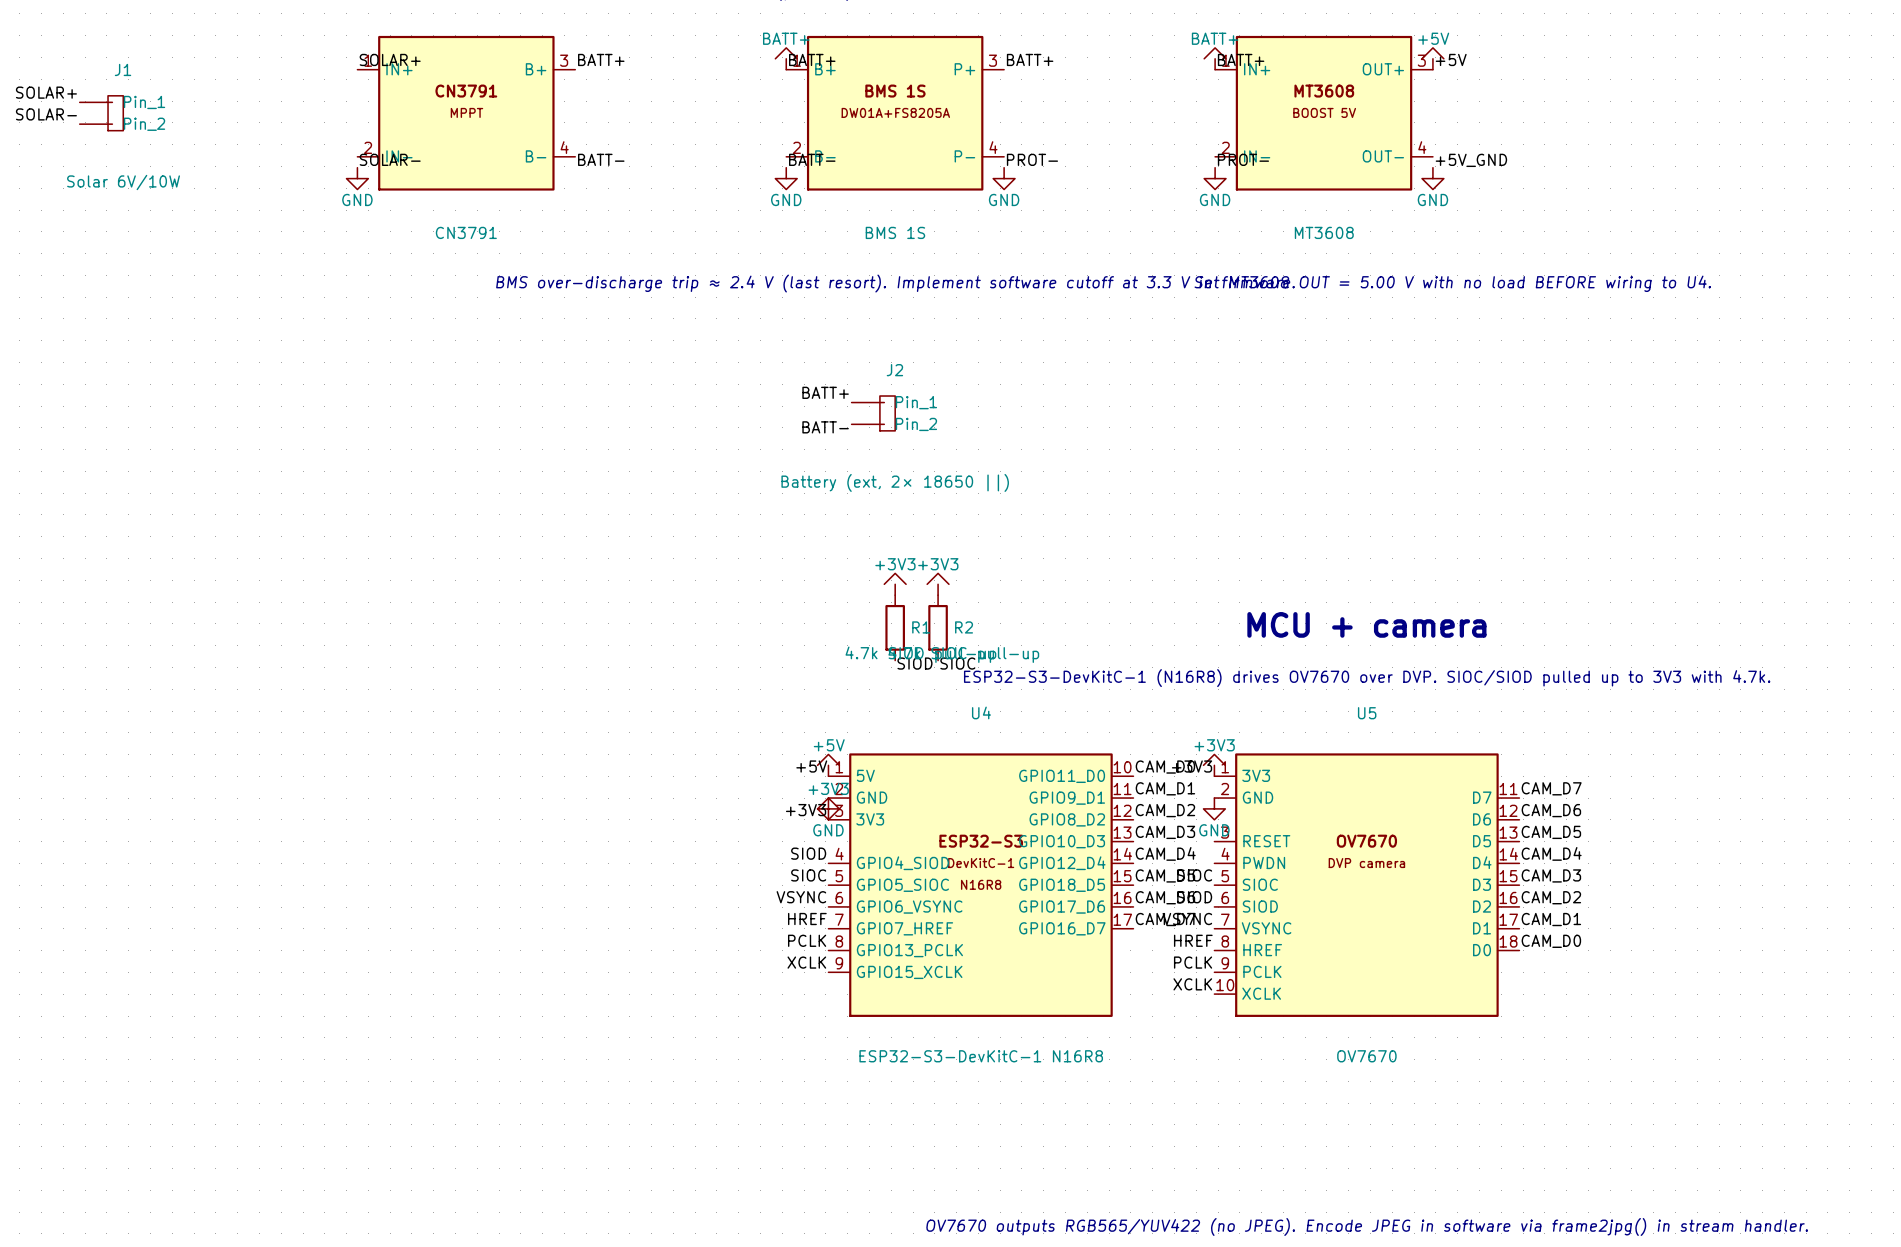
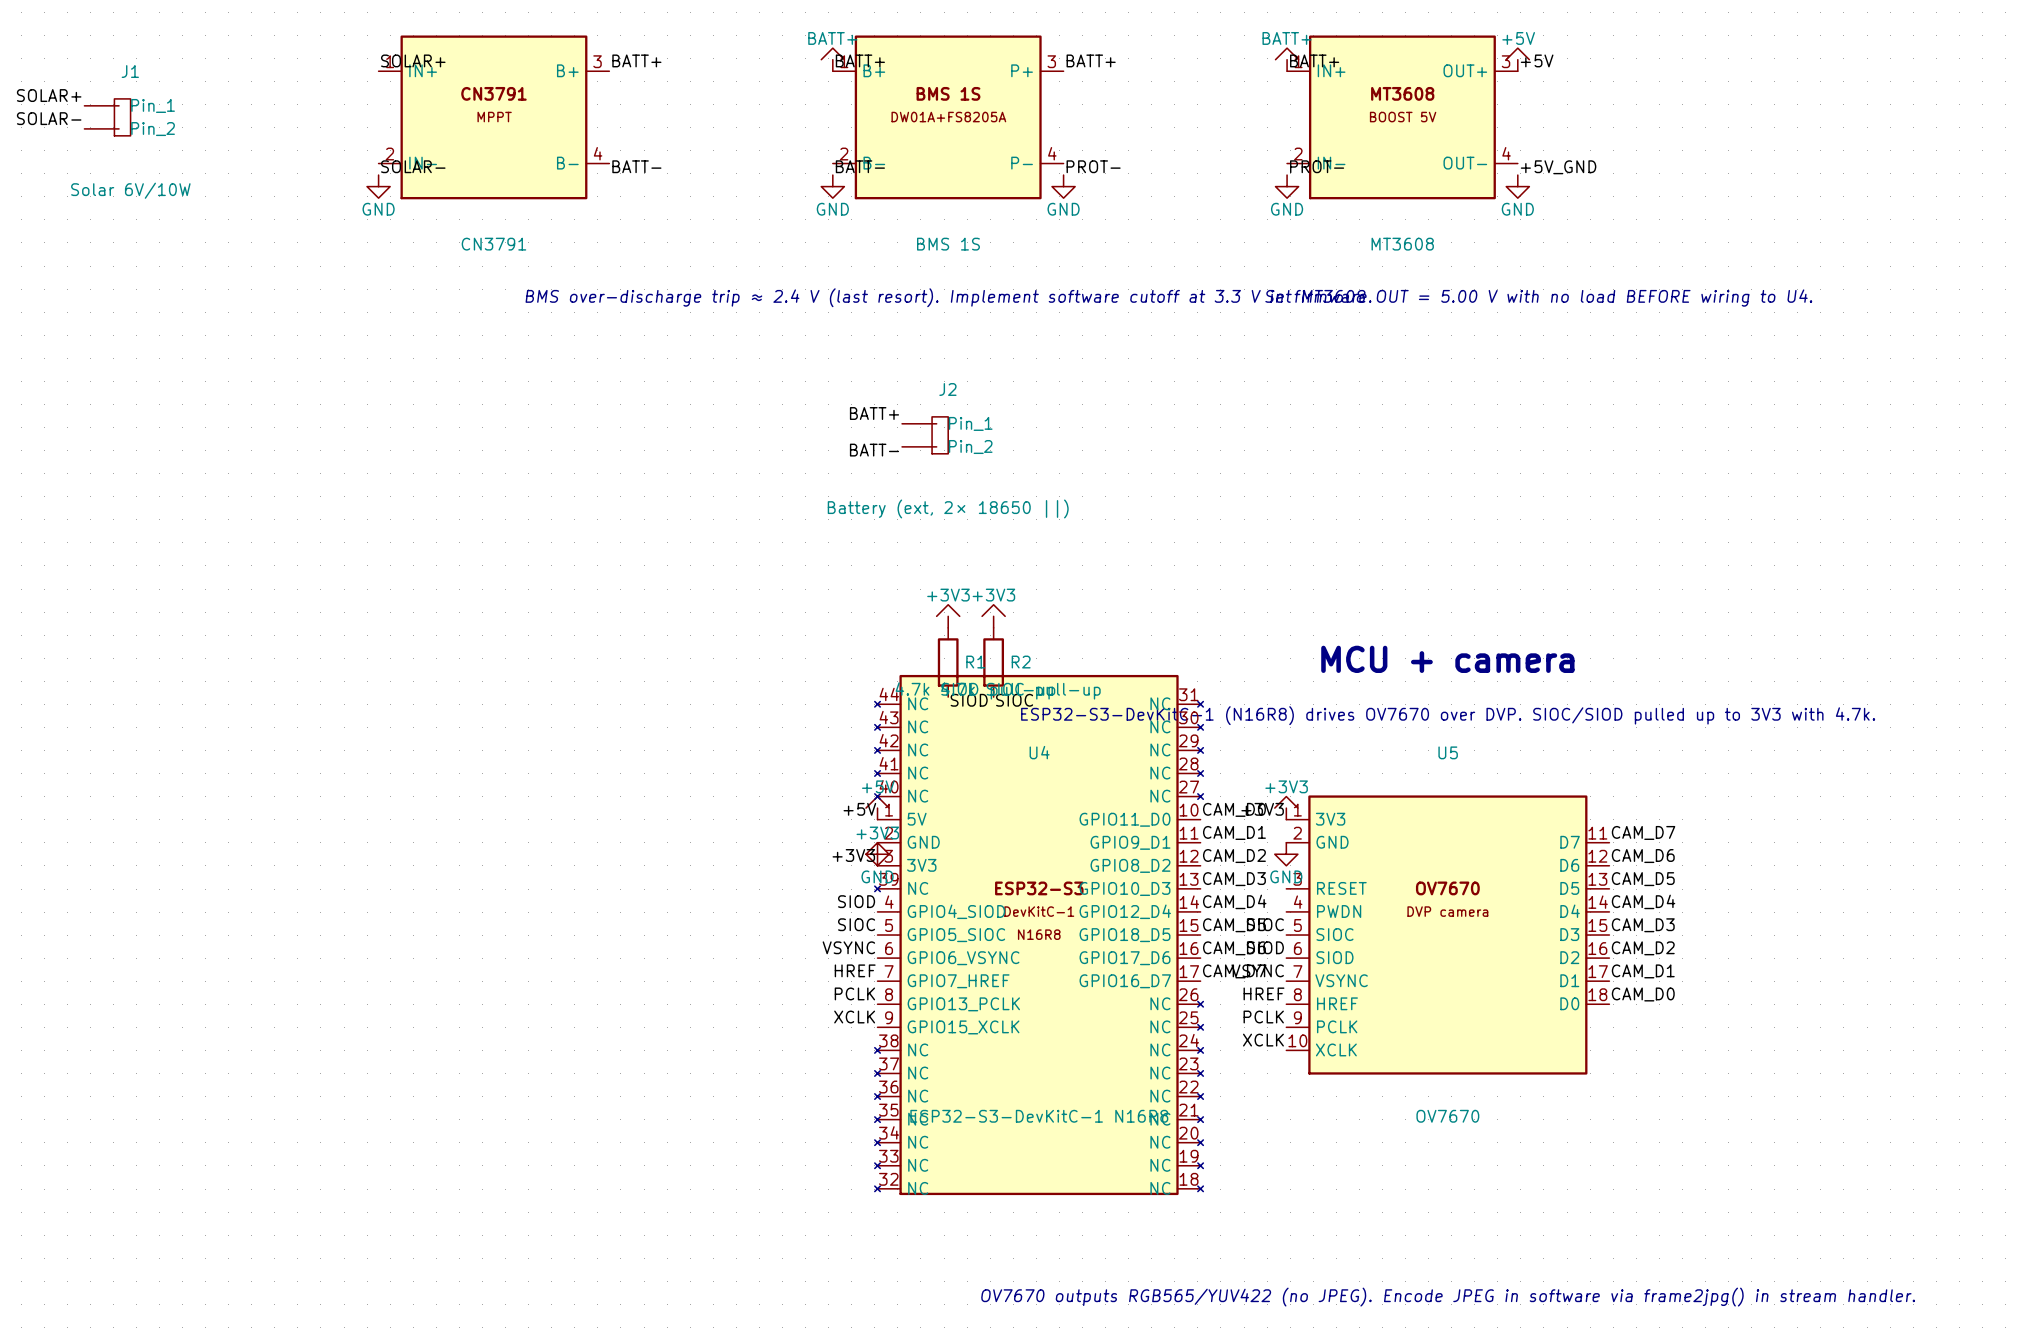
U4 symbol: [828, 753, 1134, 1017] -> [874, 674, 1204, 1196]

